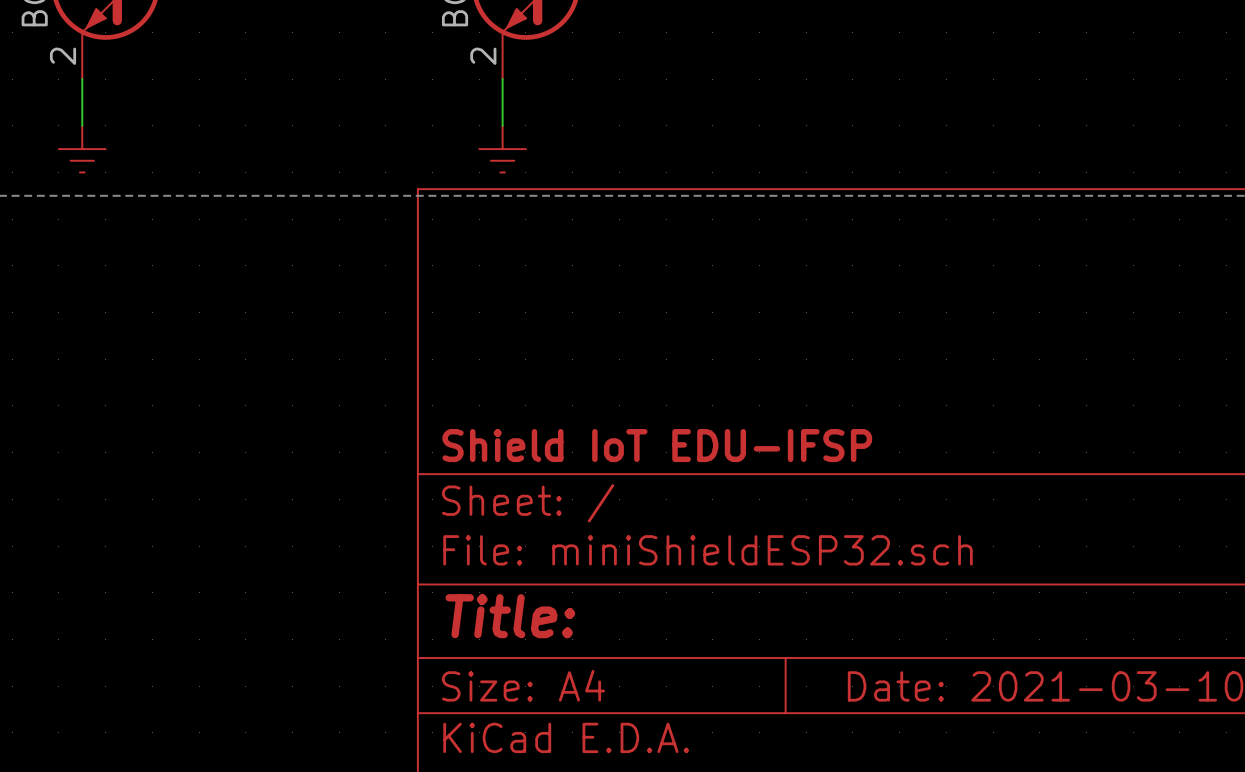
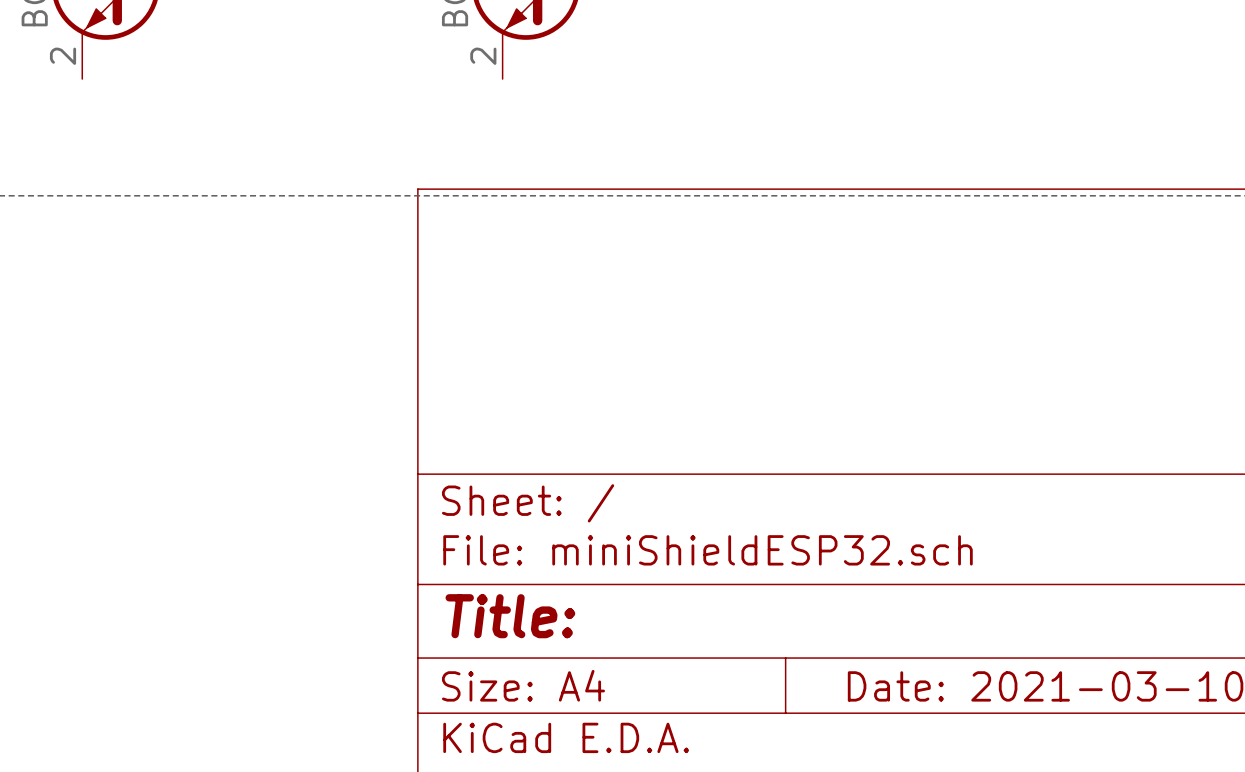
wire: (82, 79) (82, 125) -> none
wire: (502, 79) (502, 125) -> none
power symbol: (82, 149) -> none
power symbol: (502, 149) -> none
title block: Shield IoT EDU-IFSP (657, 445) -> none

